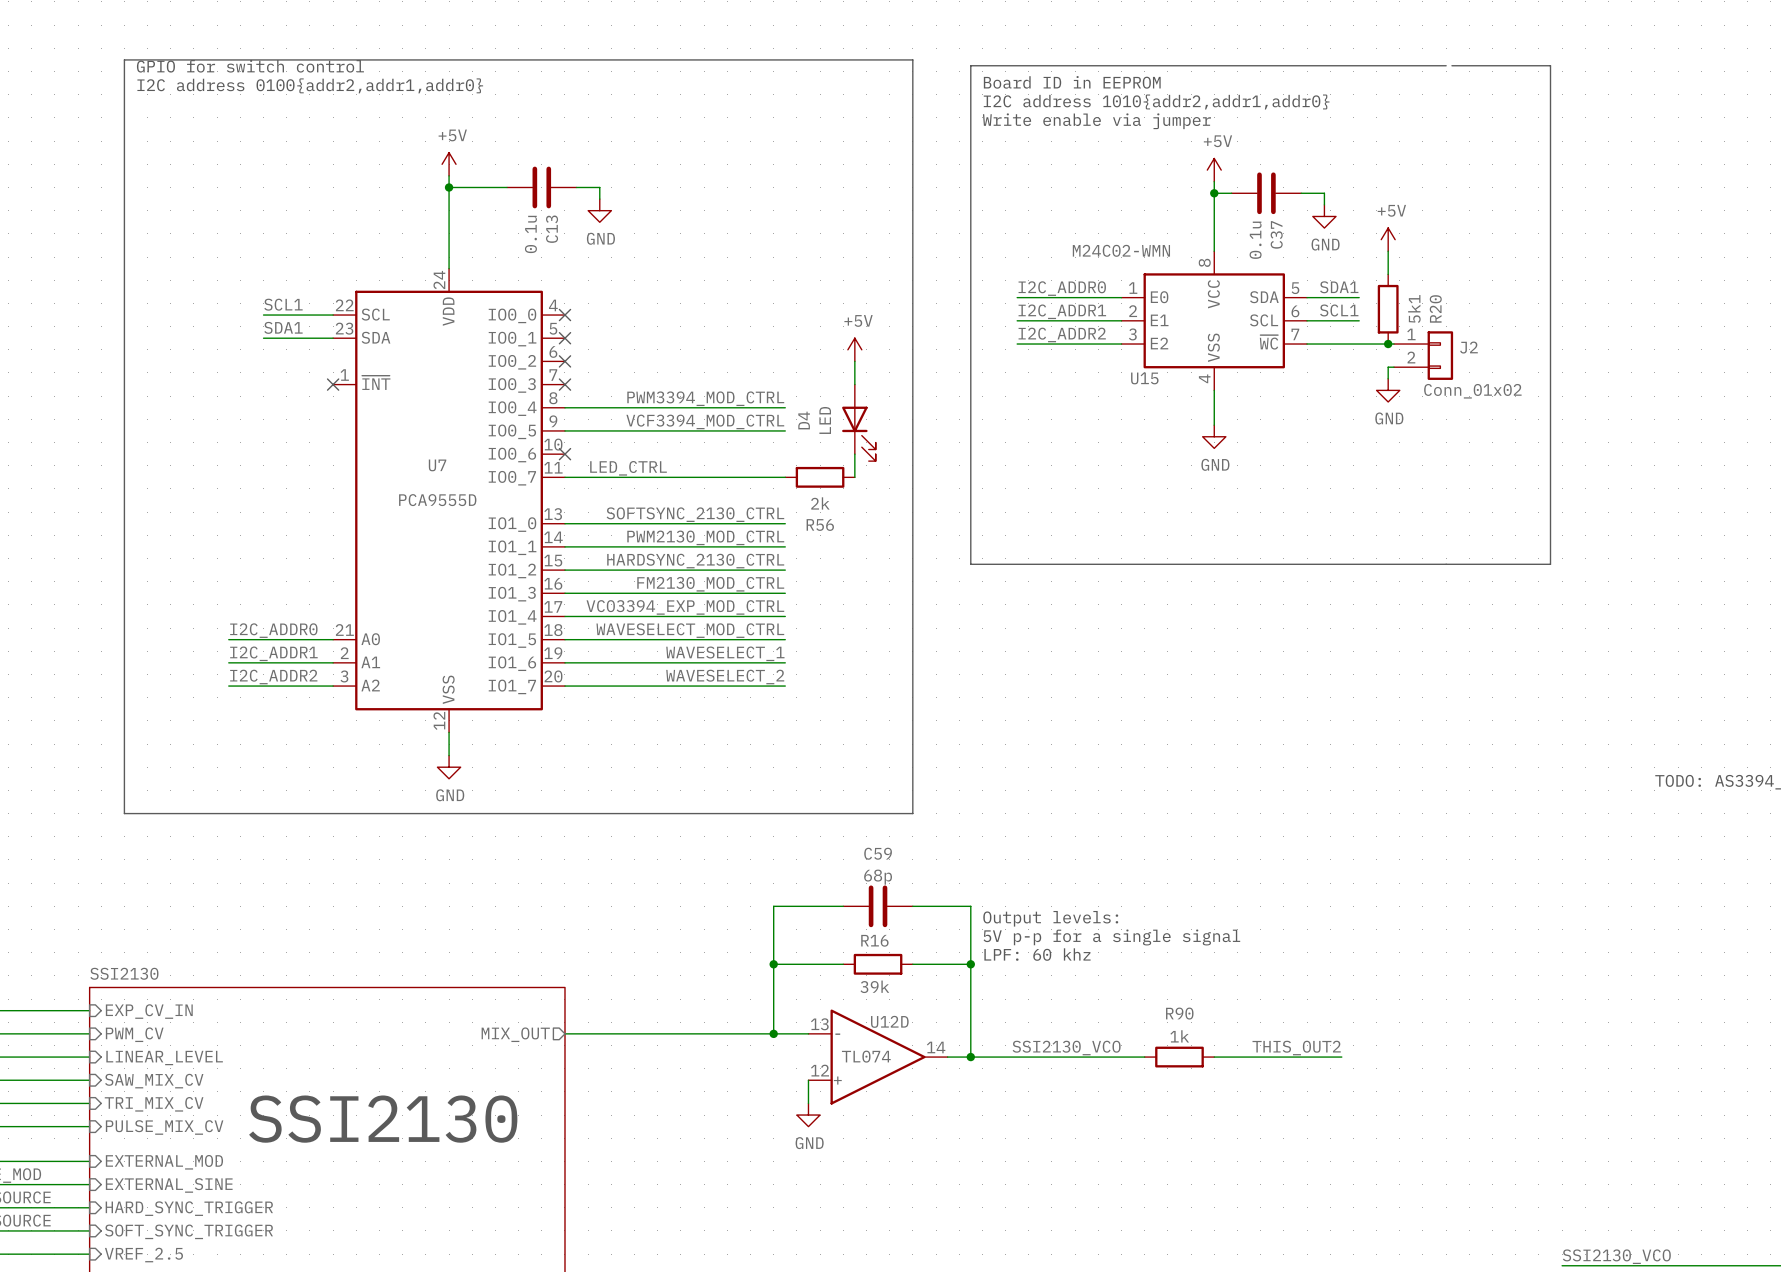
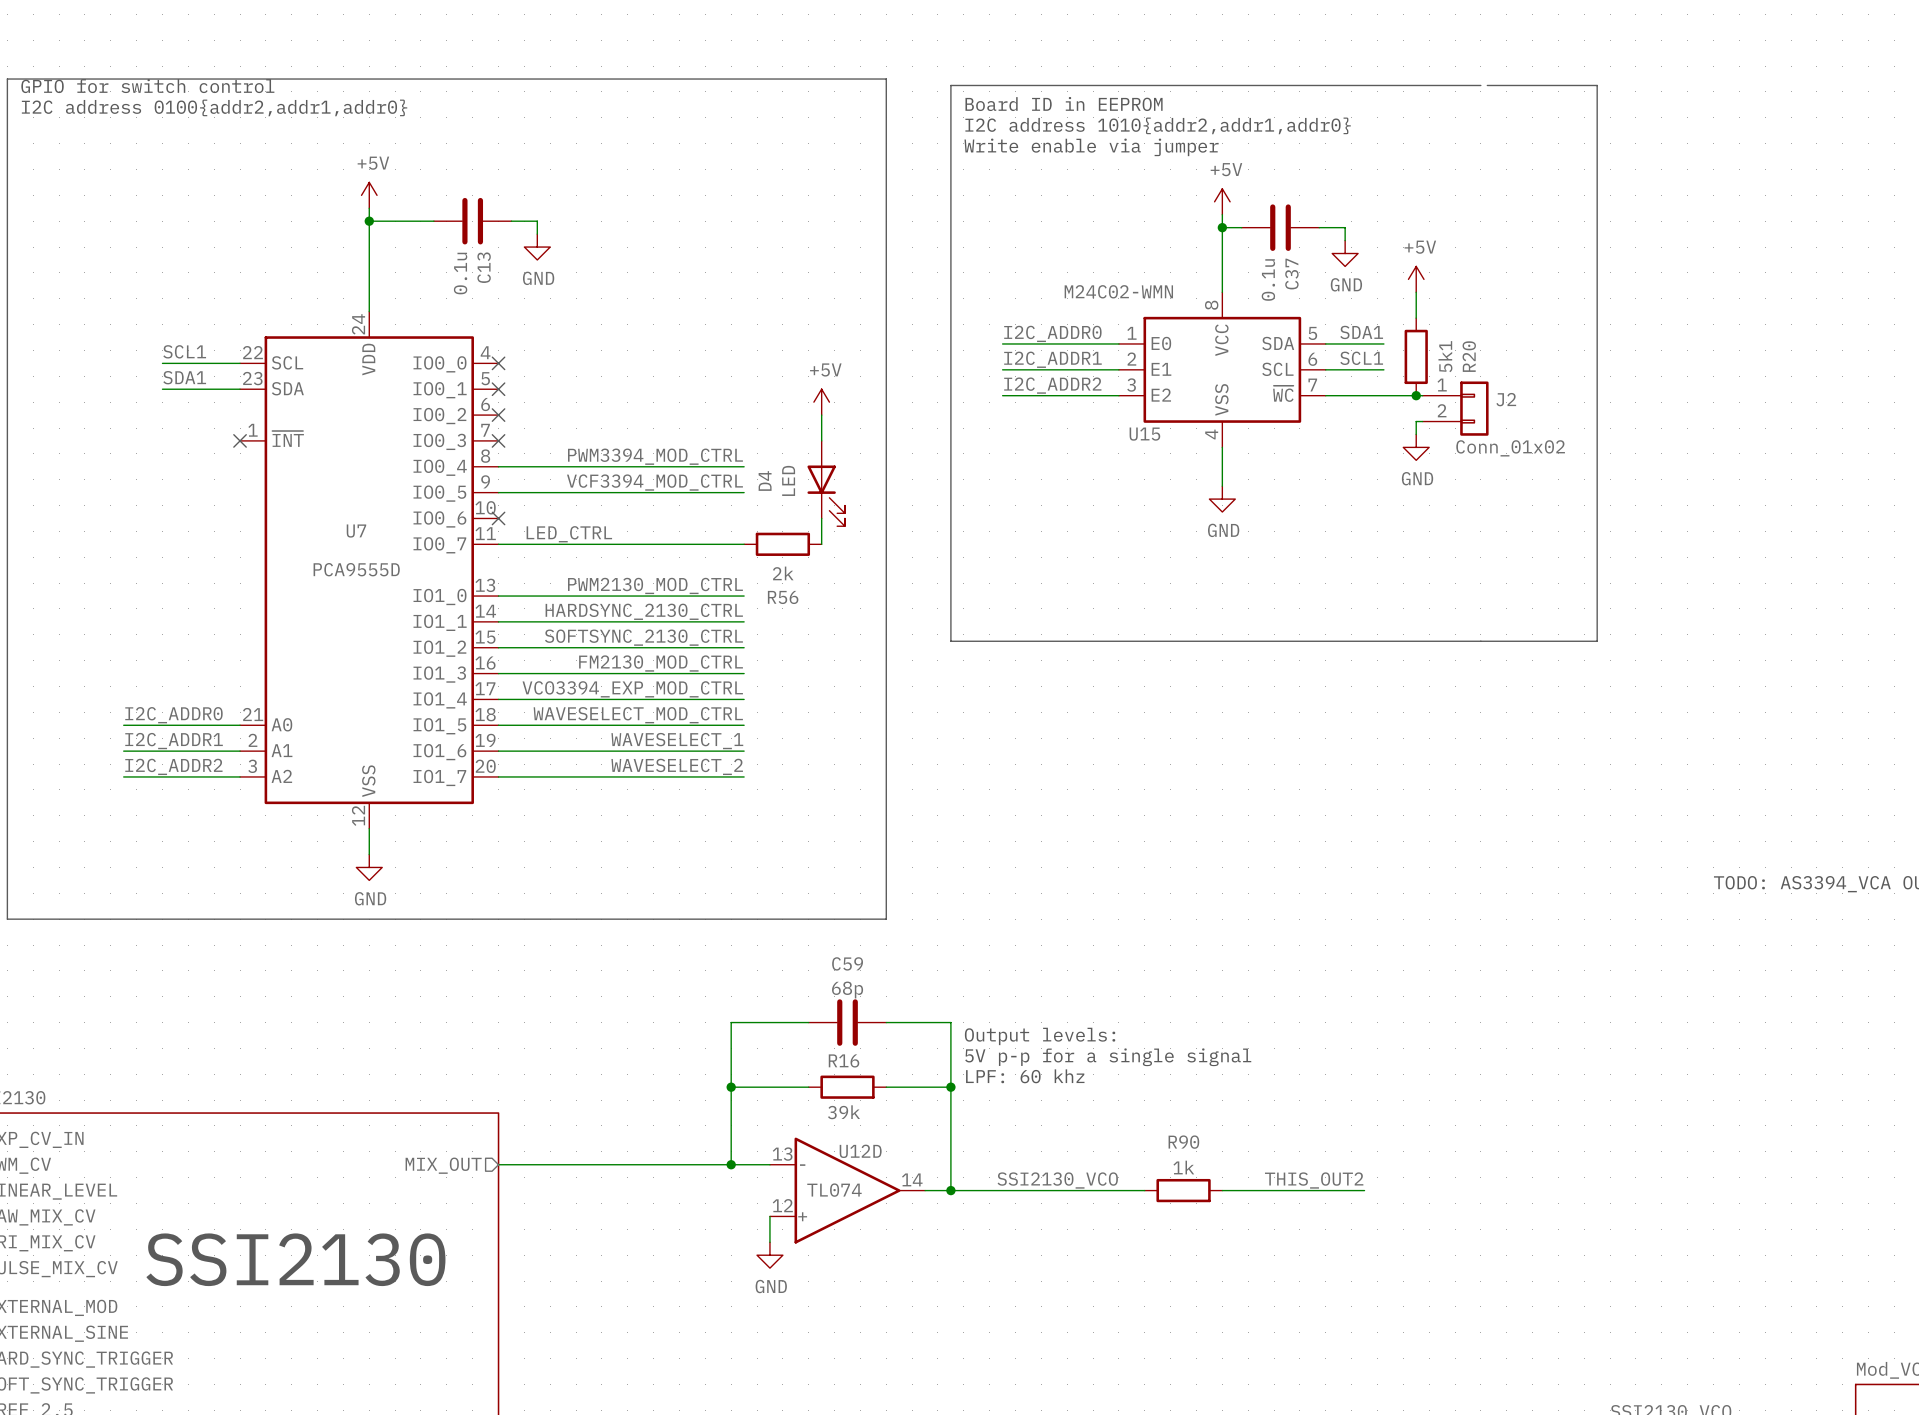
label: SOFTSYNC_2130_CTRL (695, 514) -> PWM2130_MOD_CTRL (655, 585)
label: PWM2130_MOD_CTRL (705, 537) -> HARDSYNC_2130_CTRL (644, 611)
label: HARDSYNC_2130_CTRL (695, 561) -> SOFTSYNC_2130_CTRL (643, 637)

